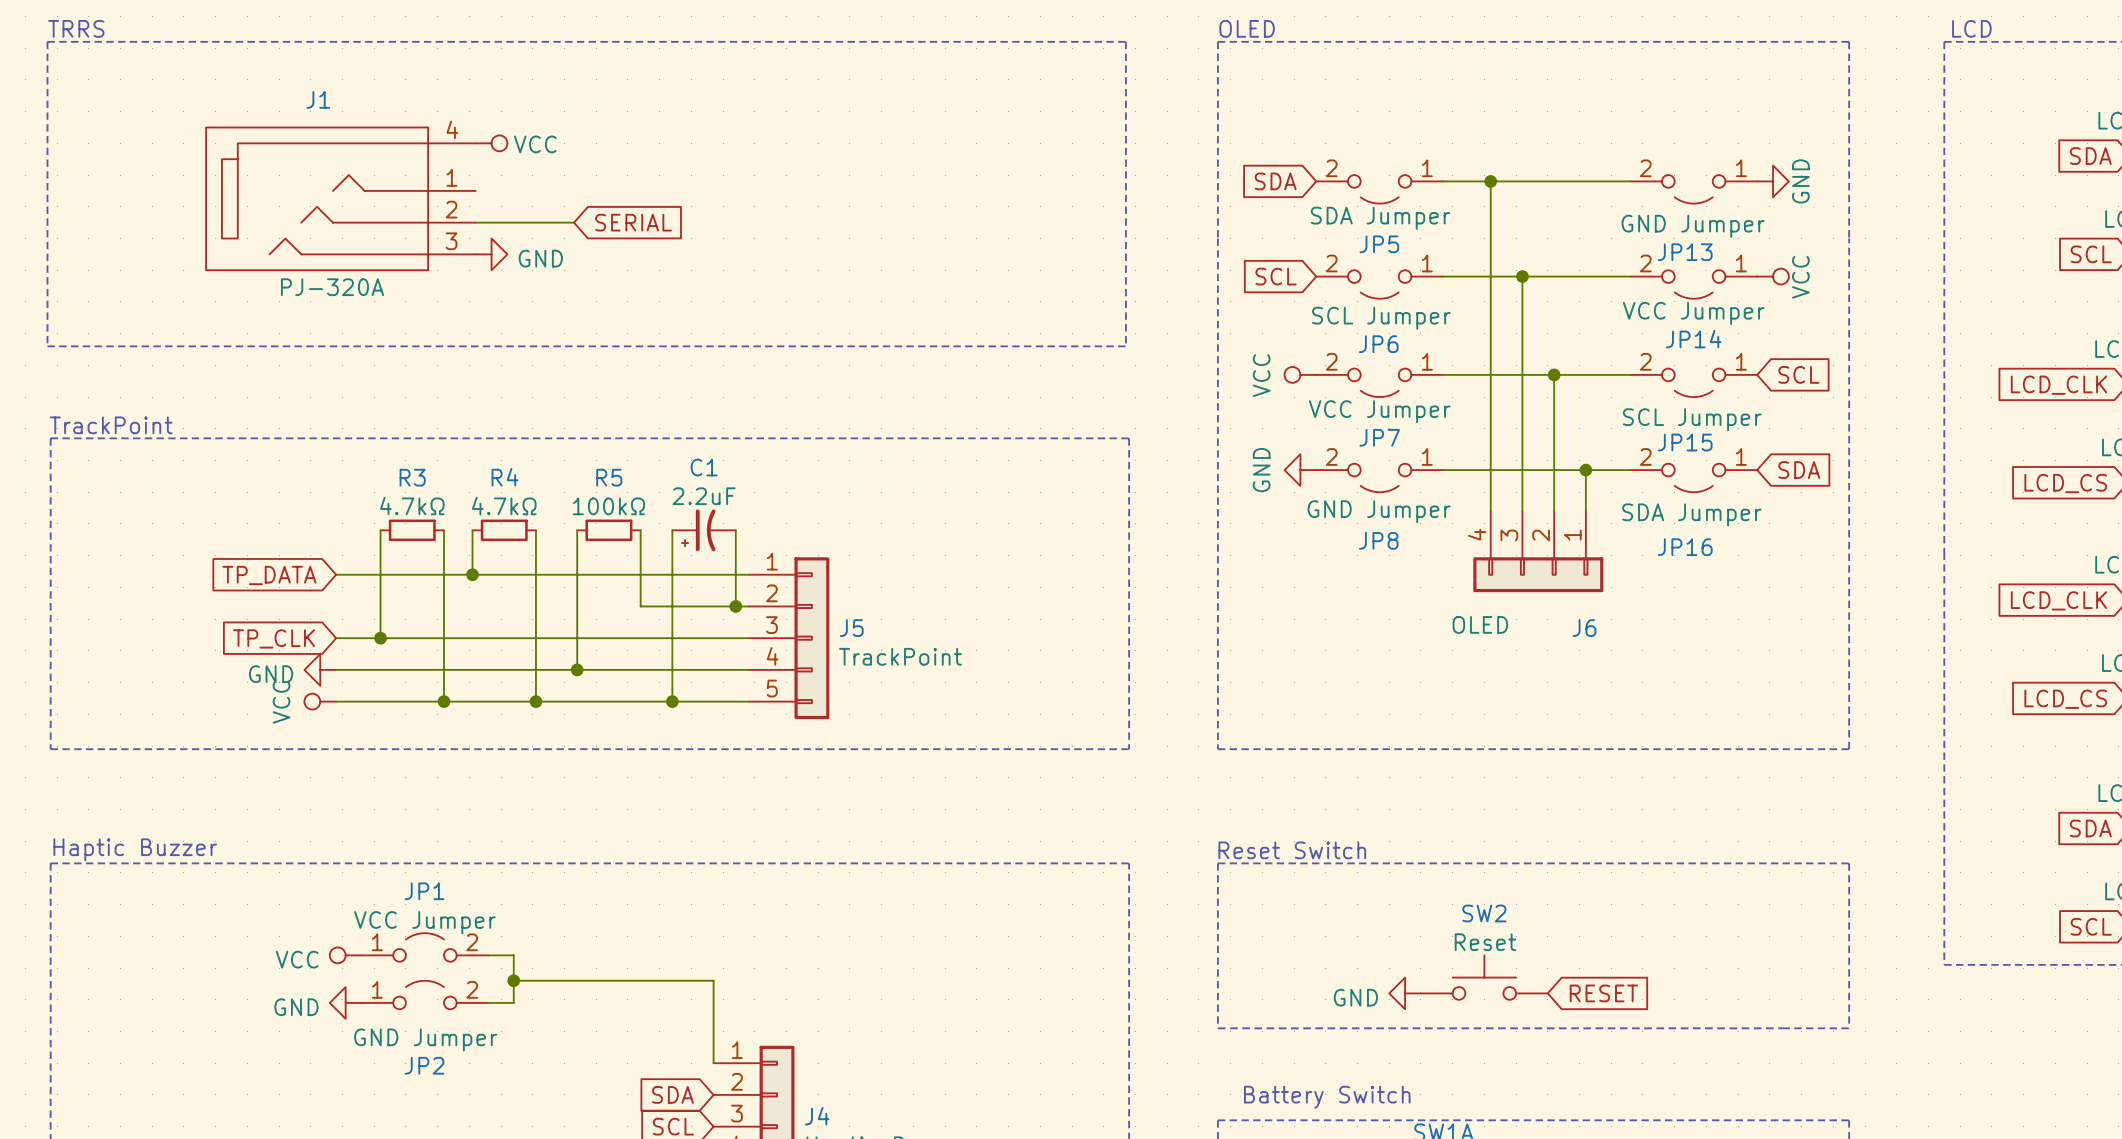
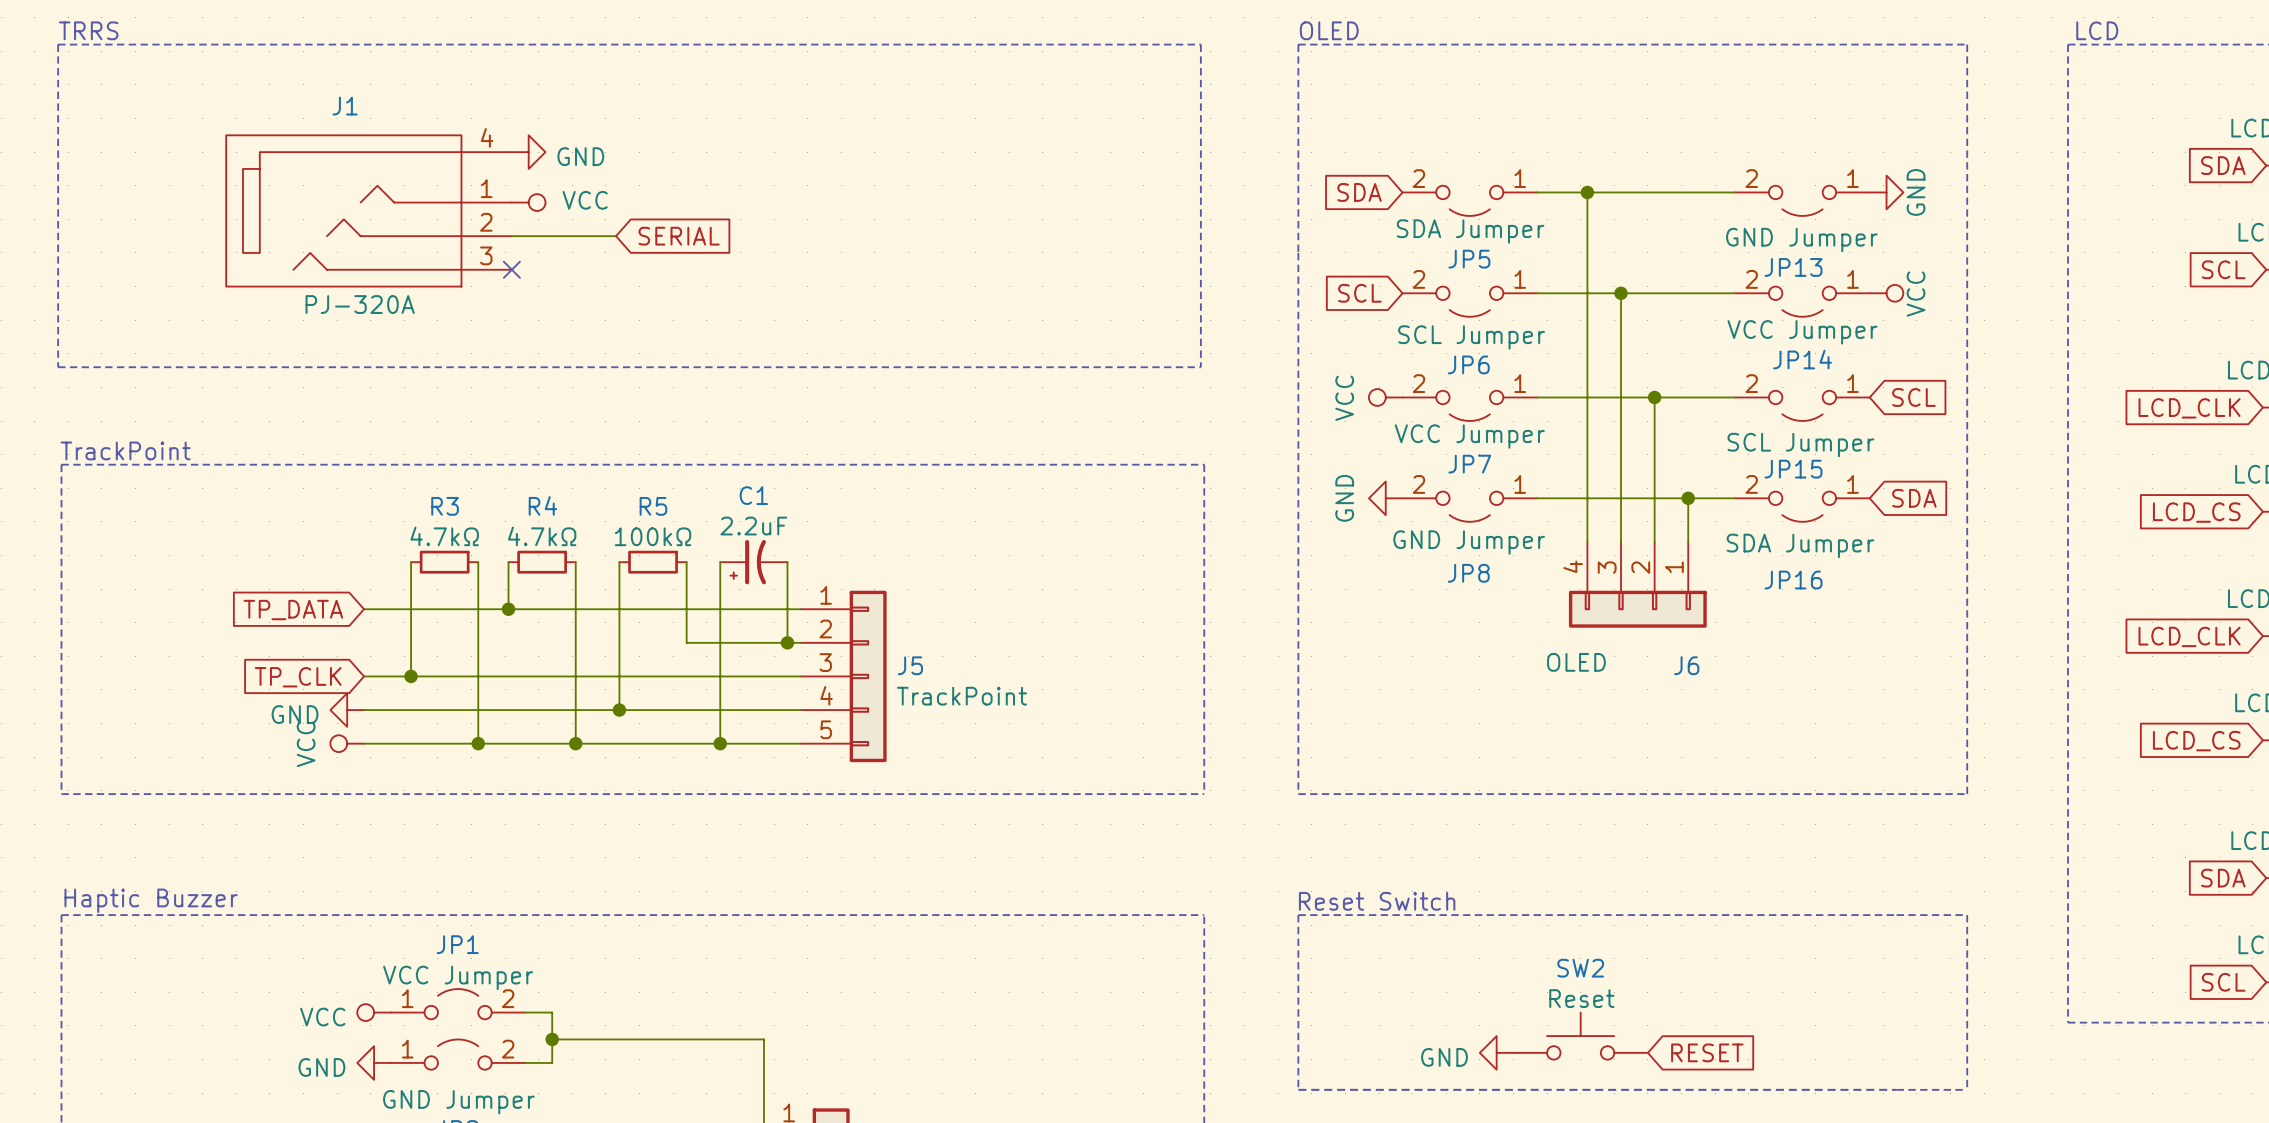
power symbol: VCC (491, 143) -> GND (528, 152)
power symbol: none -> VCC (528, 202)
no-connect mark: none -> (511, 269)
power symbol: GND (491, 254) -> none

